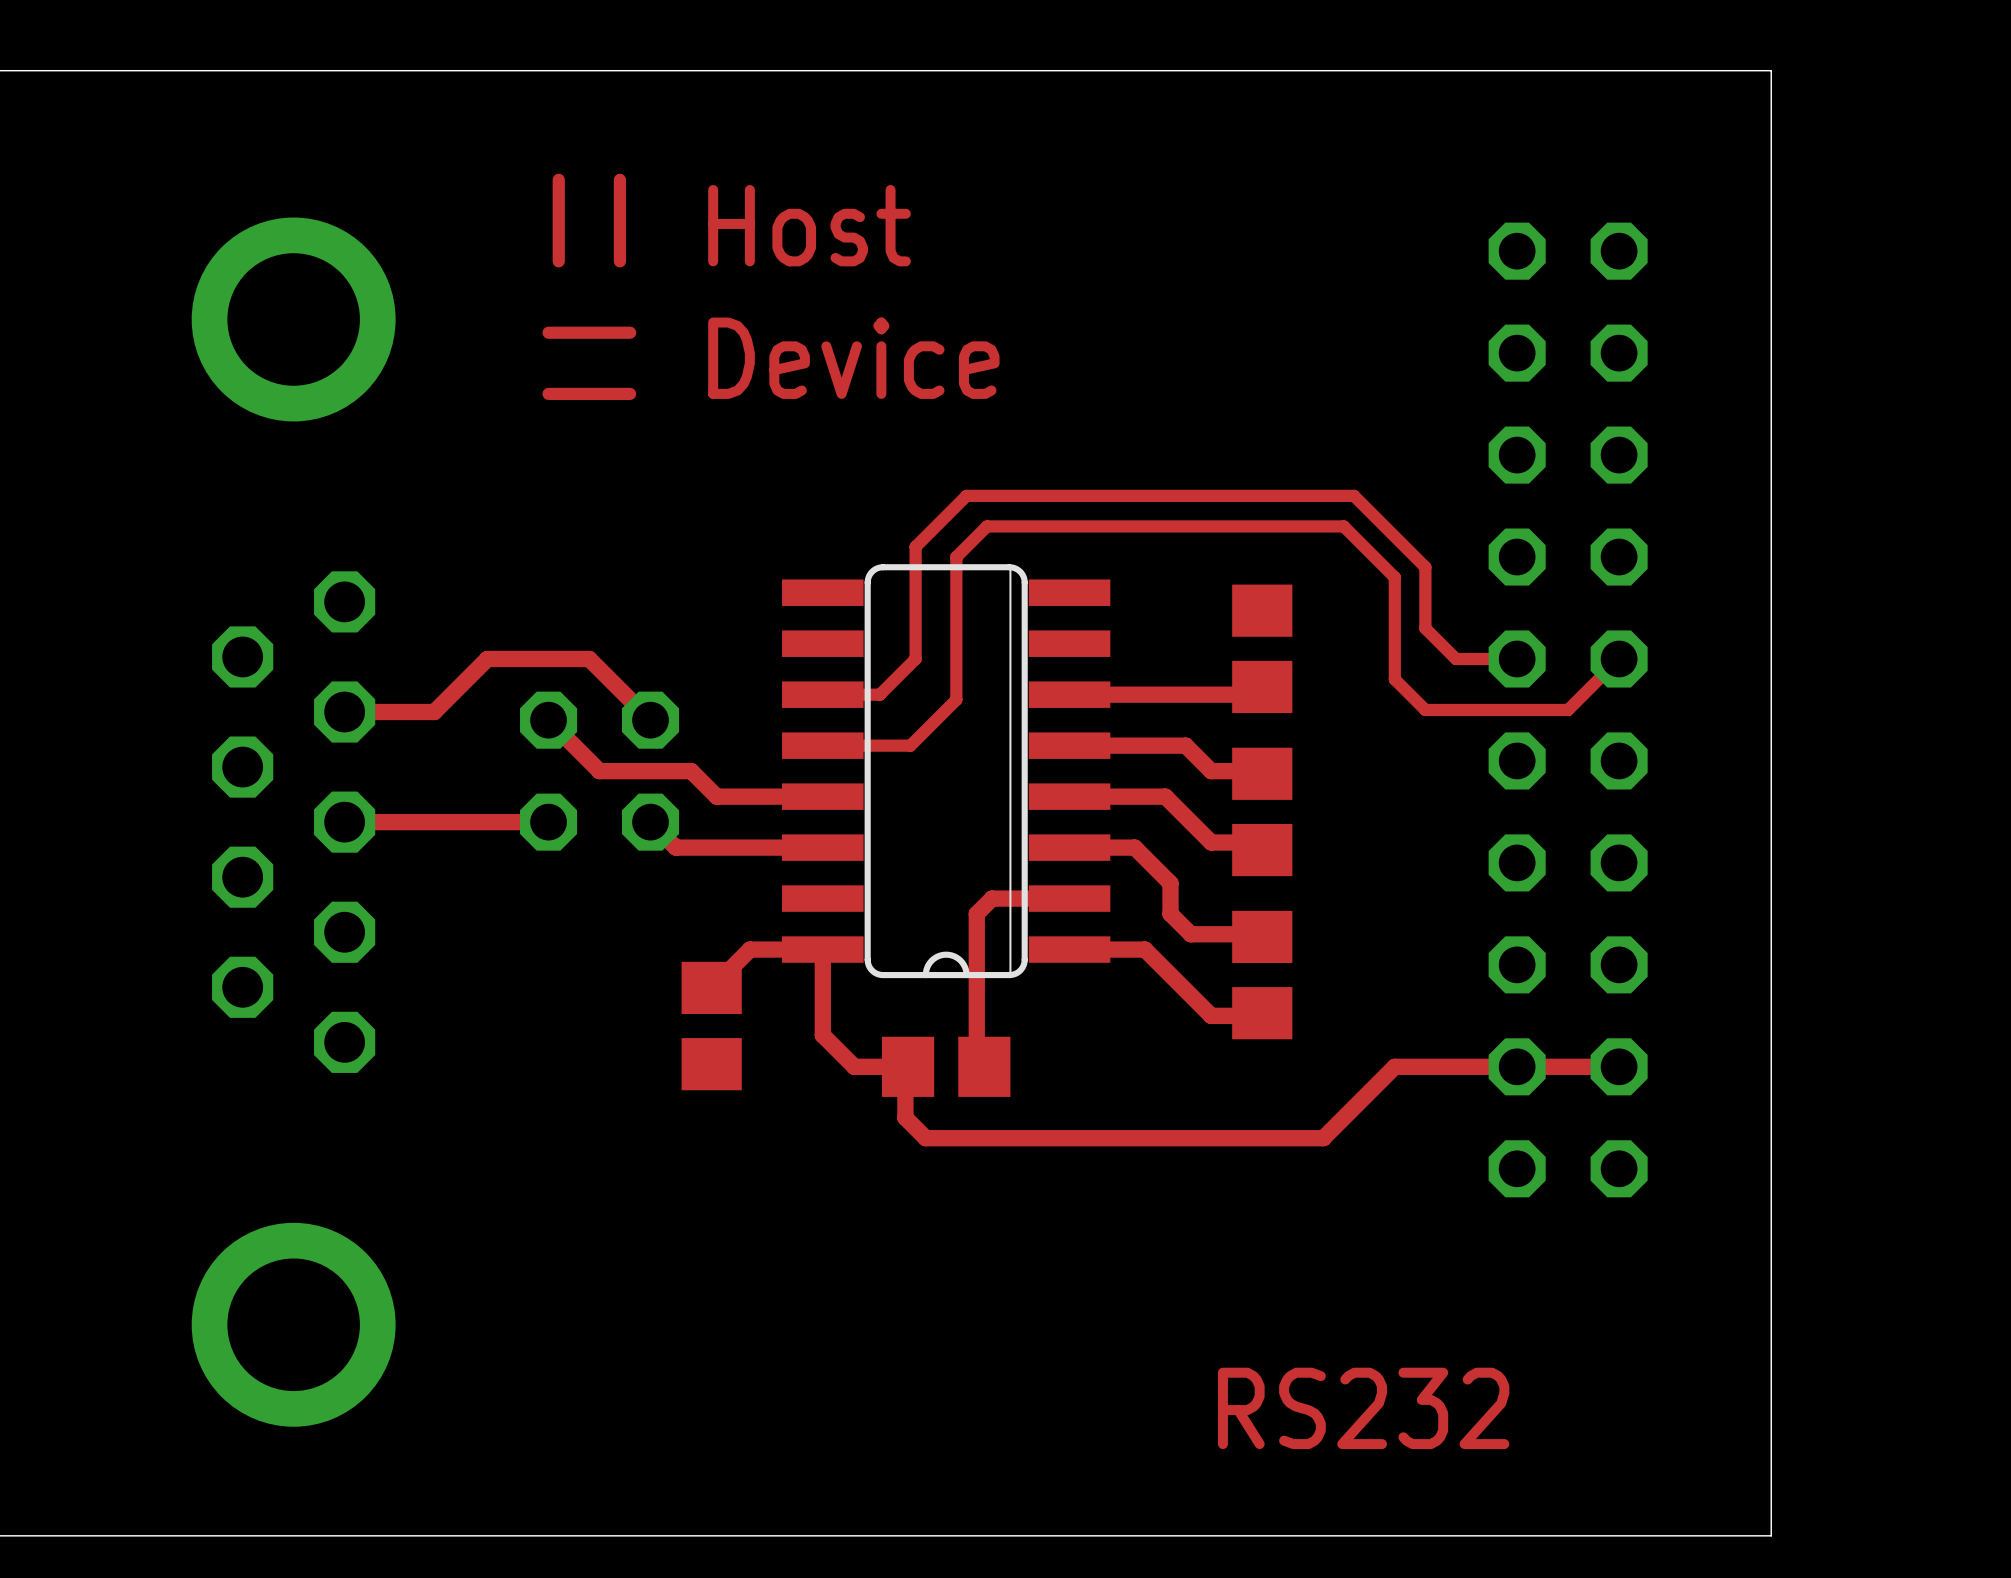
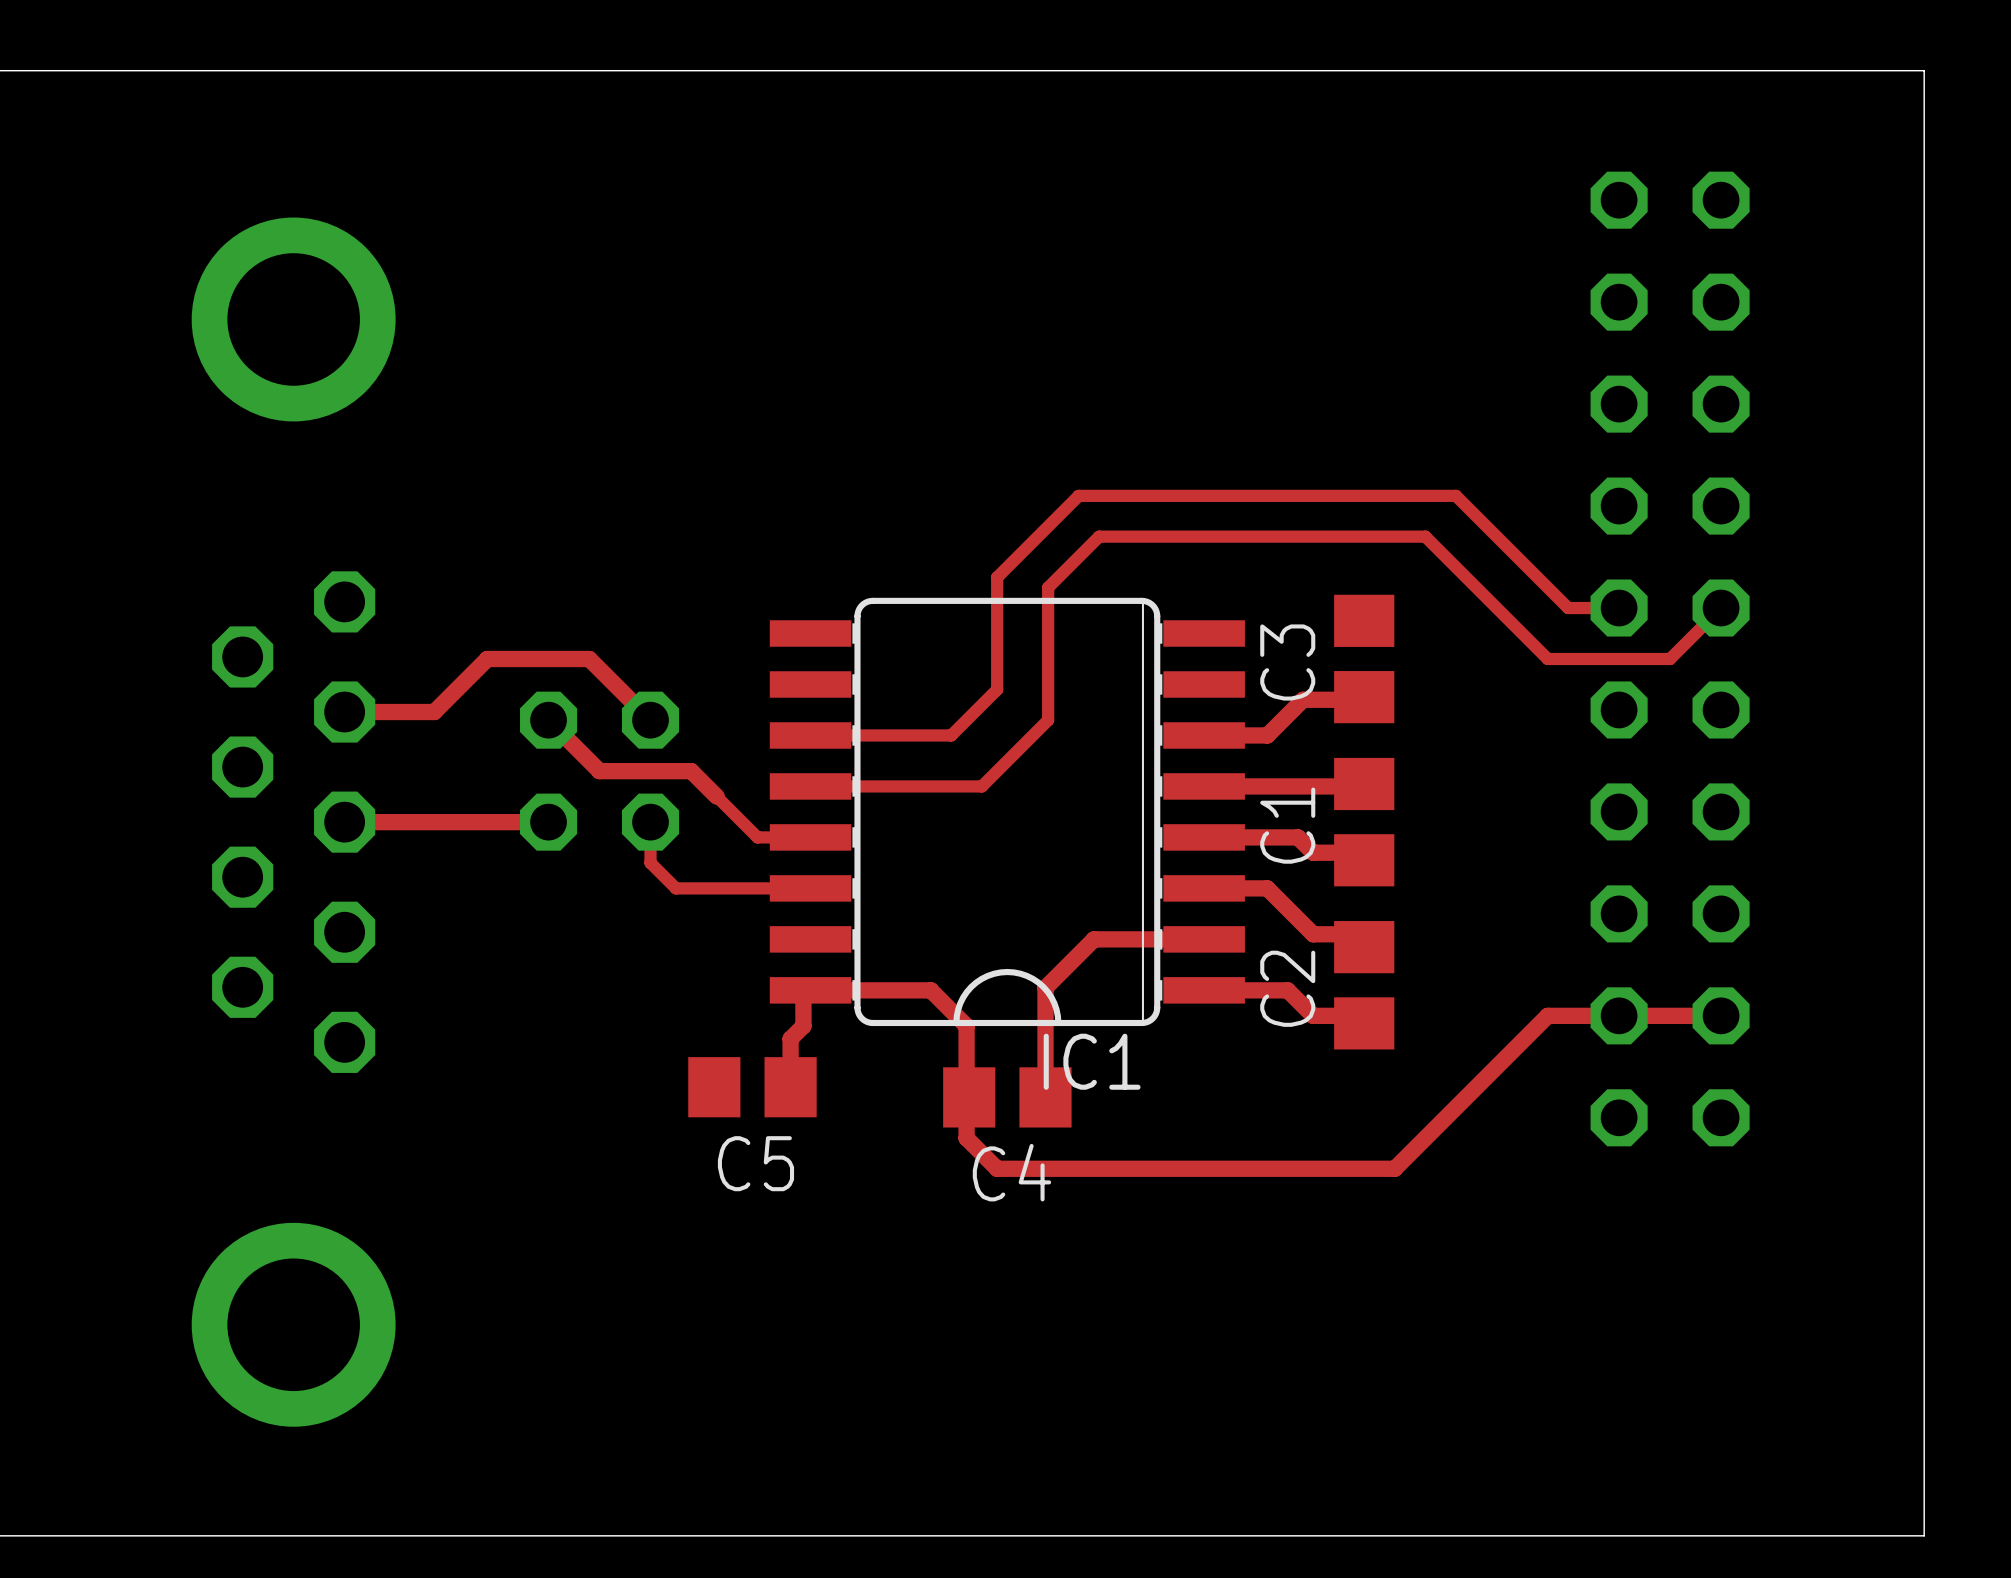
board edge: (1771, 70) (1771, 1535) -> (1771, 70) (1924, 70) (1924, 1535) (1771, 1535)
track: (558, 179) (558, 261) -> none
track: (619, 179) (619, 261) -> none
text: Host (809, 225) -> none
track: (548, 332) (630, 332) -> none
text: Device (853, 358) -> none
track: (548, 393) (630, 393) -> none
track: (1078, 495) (966, 495) (915, 546) (915, 659) (879, 694) (822, 694) -> (1078, 495) (997, 577) (997, 689) (951, 735) (810, 735)
track: (1354, 495) (1425, 567) (1425, 628) (1455, 659) (1517, 659) -> (1354, 495) (1455, 495) (1568, 608) (1619, 608)
track: none -> (1721, 608) (1670, 659) (1547, 659) (1425, 536) (1099, 536) (1048, 587) (1048, 720) (981, 786) (810, 786)
part: (1262, 648) -> none
C3: none -> (1364, 659)
track: (1619, 659) (1568, 709) (1425, 709) (1394, 679) (1394, 577) (1343, 526) (986, 526) (956, 557) (956, 699) (910, 745) (822, 745) -> none
track: (1262, 686) (1254, 694) (1069, 694) -> none
track: none -> (1364, 697) (1361, 699) (1303, 699) (1267, 735) (1204, 735)
part position: (1568, 709) -> (1670, 659)
track: (1069, 745) (1185, 745) (1211, 771) (1259, 771) (1262, 773) -> none
part: (946, 771) -> none
track: none -> (1364, 783) (1361, 786) (1204, 786)
track: (716, 796) (822, 796) -> (716, 796) (757, 837) (810, 837)
track: (1069, 796) (1165, 796) (1211, 842) (1254, 842) (1262, 850) -> none
IC1: none -> (1007, 811)
part: (1262, 811) -> none
track: (650, 822) (676, 847) (822, 847) -> (650, 822) (650, 862) (676, 888) (810, 888)
C1: none -> (1364, 822)
track: none -> (1204, 837) (1297, 837) (1313, 852) (1356, 852) (1364, 860)
track: (1069, 847) (1134, 847) (1170, 883) (1170, 913) (1190, 934) (1259, 934) (1262, 936) -> none
track: none -> (1204, 888) (1267, 888) (1313, 934) (1351, 934) (1364, 947)
track: (1069, 898) (992, 898) (976, 913) (976, 1059) (984, 1066) -> none
track: none -> (1204, 939) (1094, 939) (1045, 987) (1045, 1097)
track: (1069, 949) (1145, 949) (1211, 1015) (1259, 1015) (1262, 1013) -> none
part: (1262, 975) -> none
C2: none -> (1364, 985)
track: (711, 987) (750, 949) (822, 949) (822, 1035) (854, 1066) (908, 1066) (905, 1069) (905, 1117) (925, 1138) (1323, 1138) (1394, 1066) (1619, 1066) -> none
track: none -> (1204, 990) (1287, 990) (1313, 1015) (1356, 1015) (1364, 1023)
track: none -> (1721, 1015) (1547, 1015) (1394, 1168) (997, 1168) (966, 1138) (966, 1100) (969, 1097) (966, 1094) (966, 1026) (930, 990) (810, 990) (803, 997) (803, 1026) (790, 1038) (790, 1087)
part: (711, 1026) -> none
part: (946, 1066) -> none
C5: none -> (752, 1087)
C4: none -> (1007, 1097)
text: RS232 (1363, 1408) -> none

